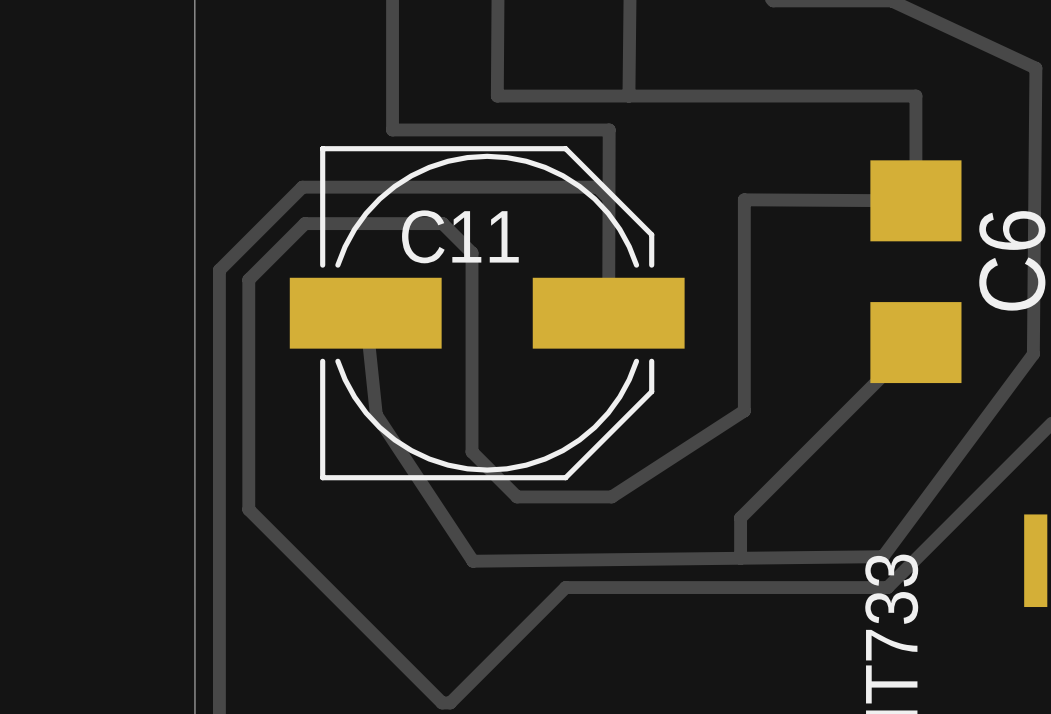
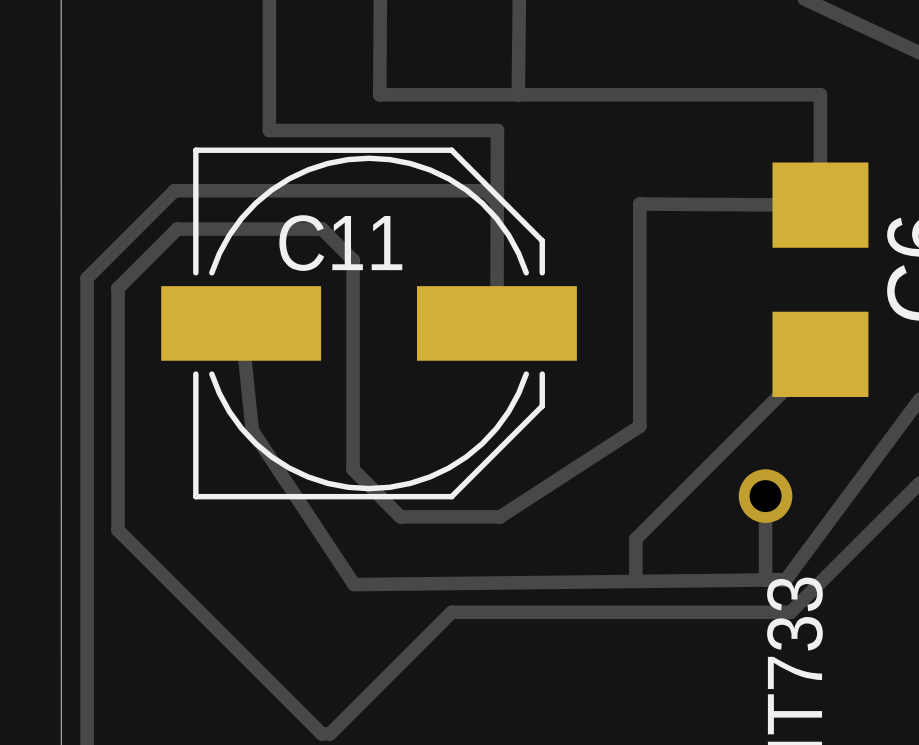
track: none -> (765, 496) (765, 579) (785, 579)
via: none -> (765, 496)

